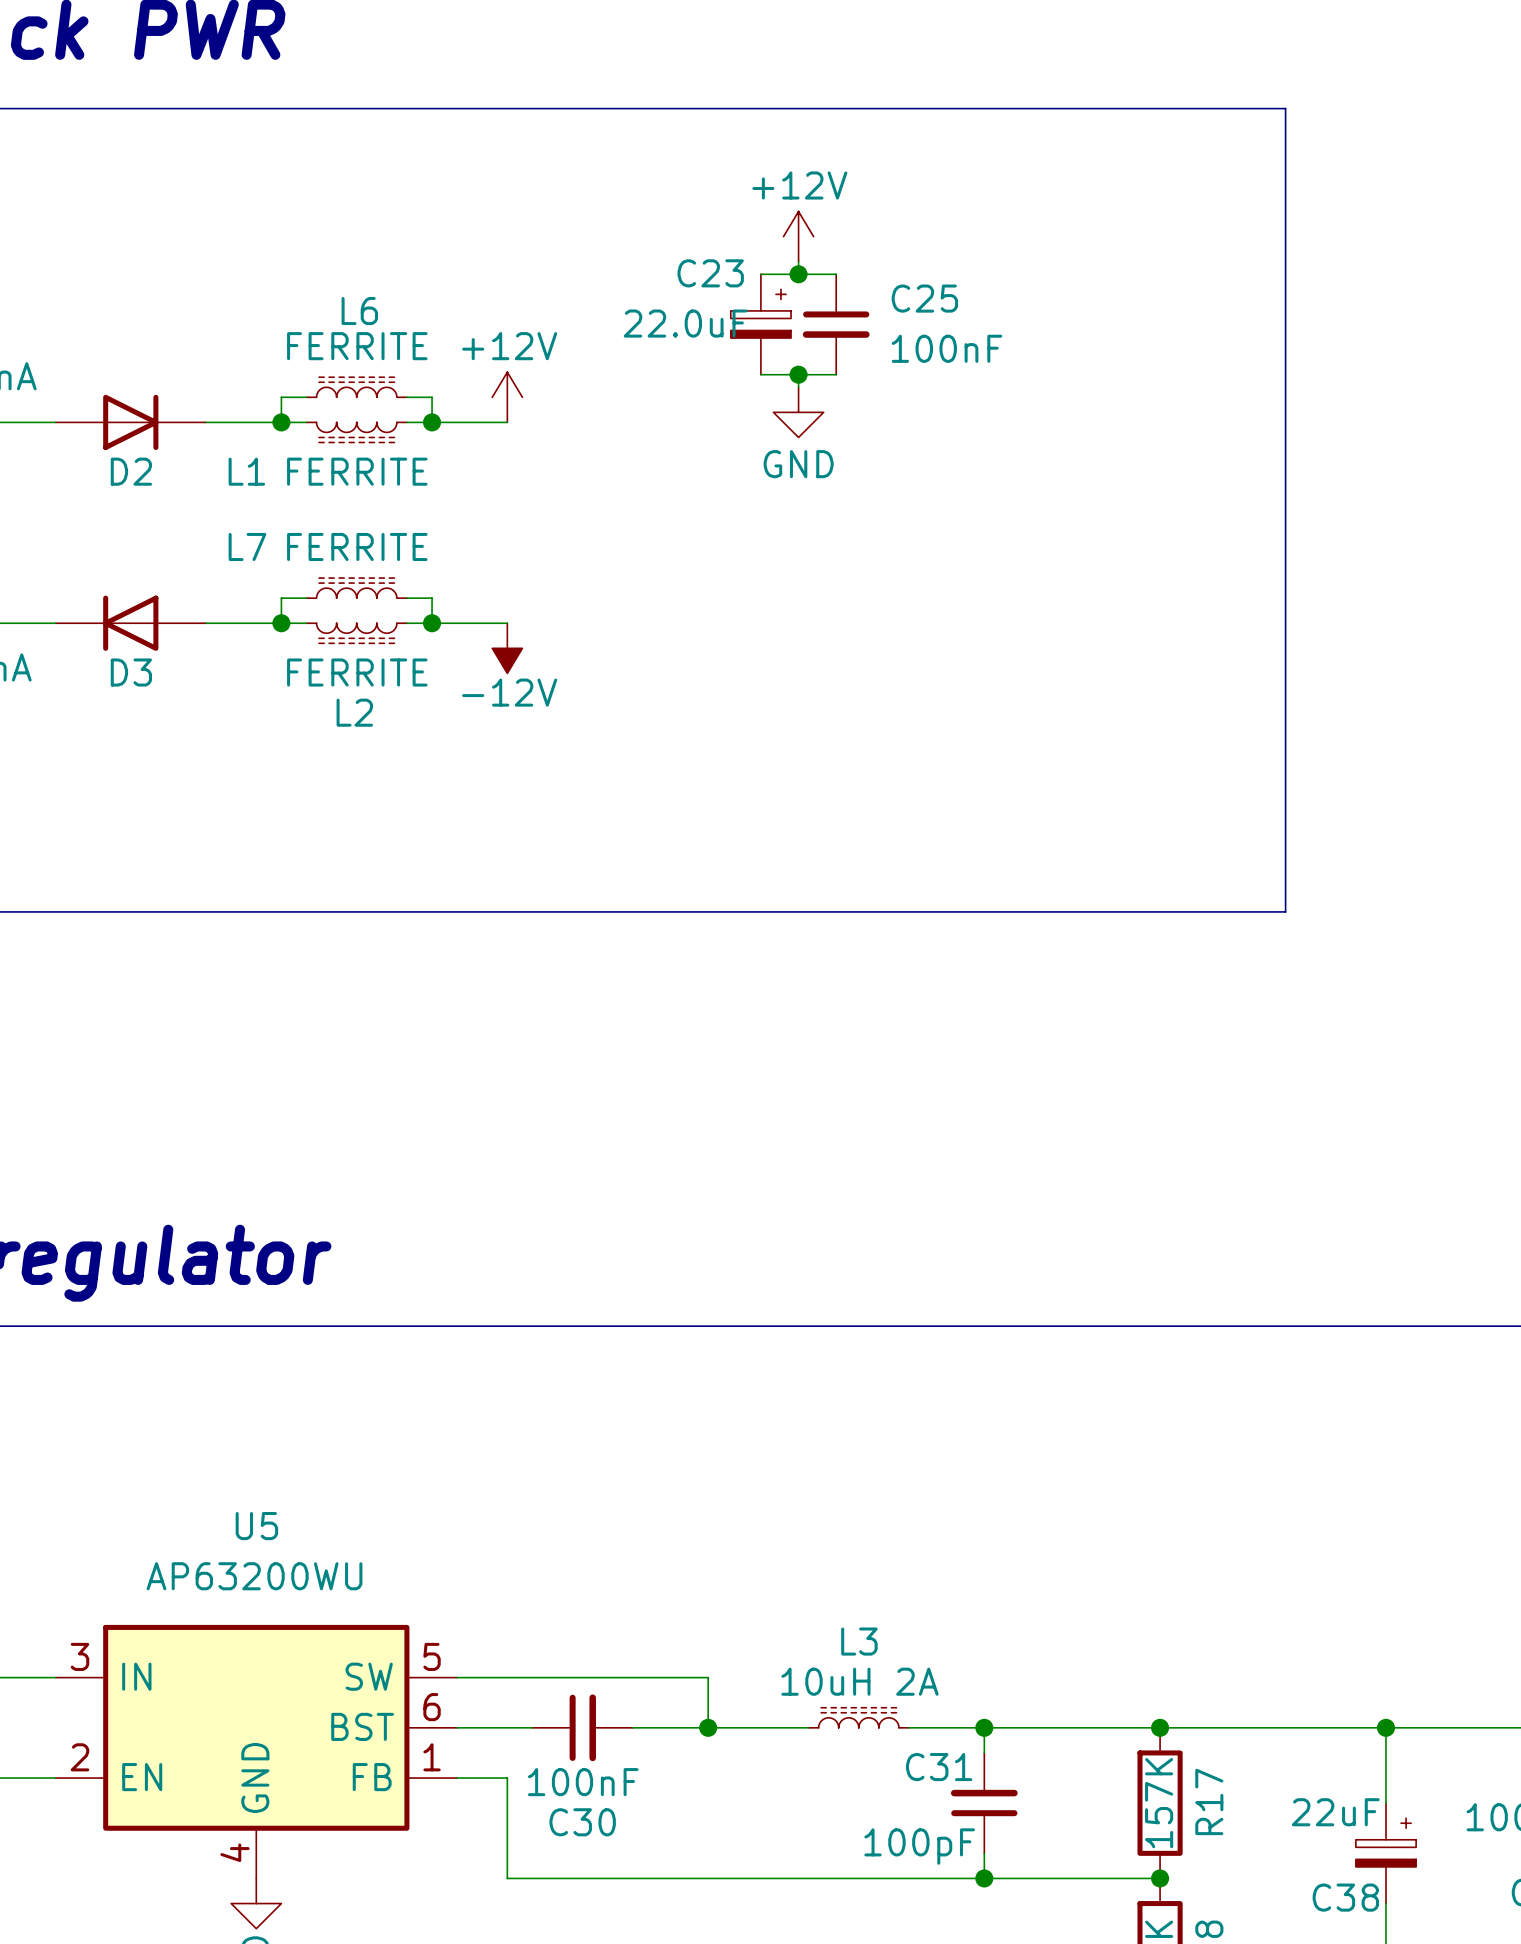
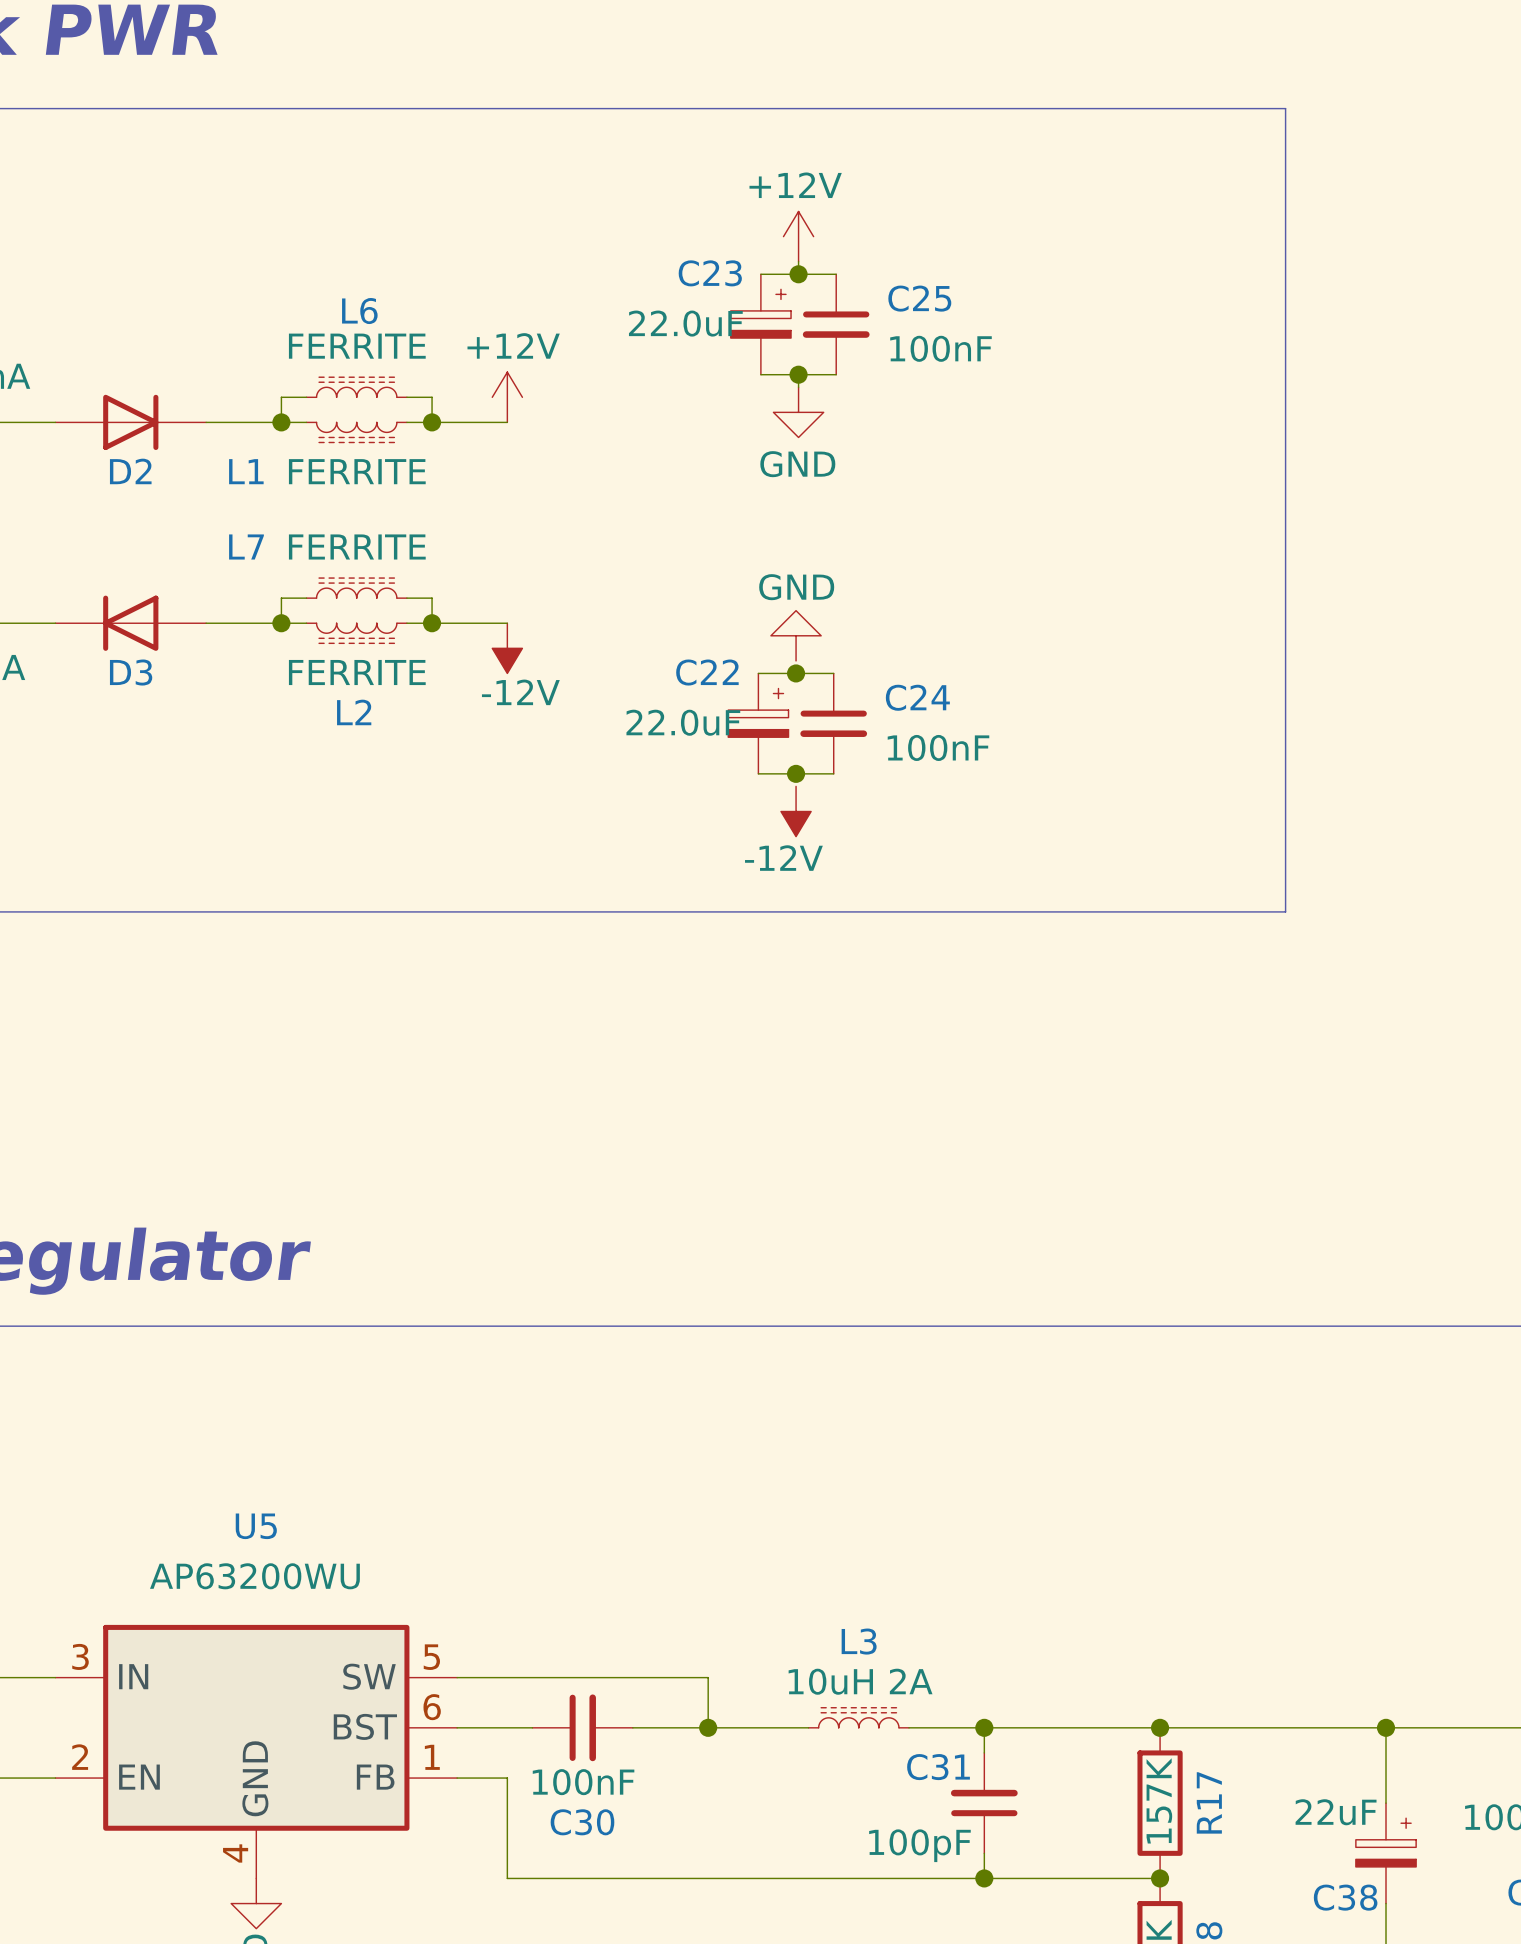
power symbol: none -> GND (796, 635)
wire: none -> (758, 673) (833, 673)
junction: none -> (796, 673)
C22: none -> 22.0uF (758, 723)
C24: none -> 100nF (833, 723)
wire: none -> (758, 773) (833, 773)
junction: none -> (796, 773)
power symbol: none -> -12V (796, 811)

